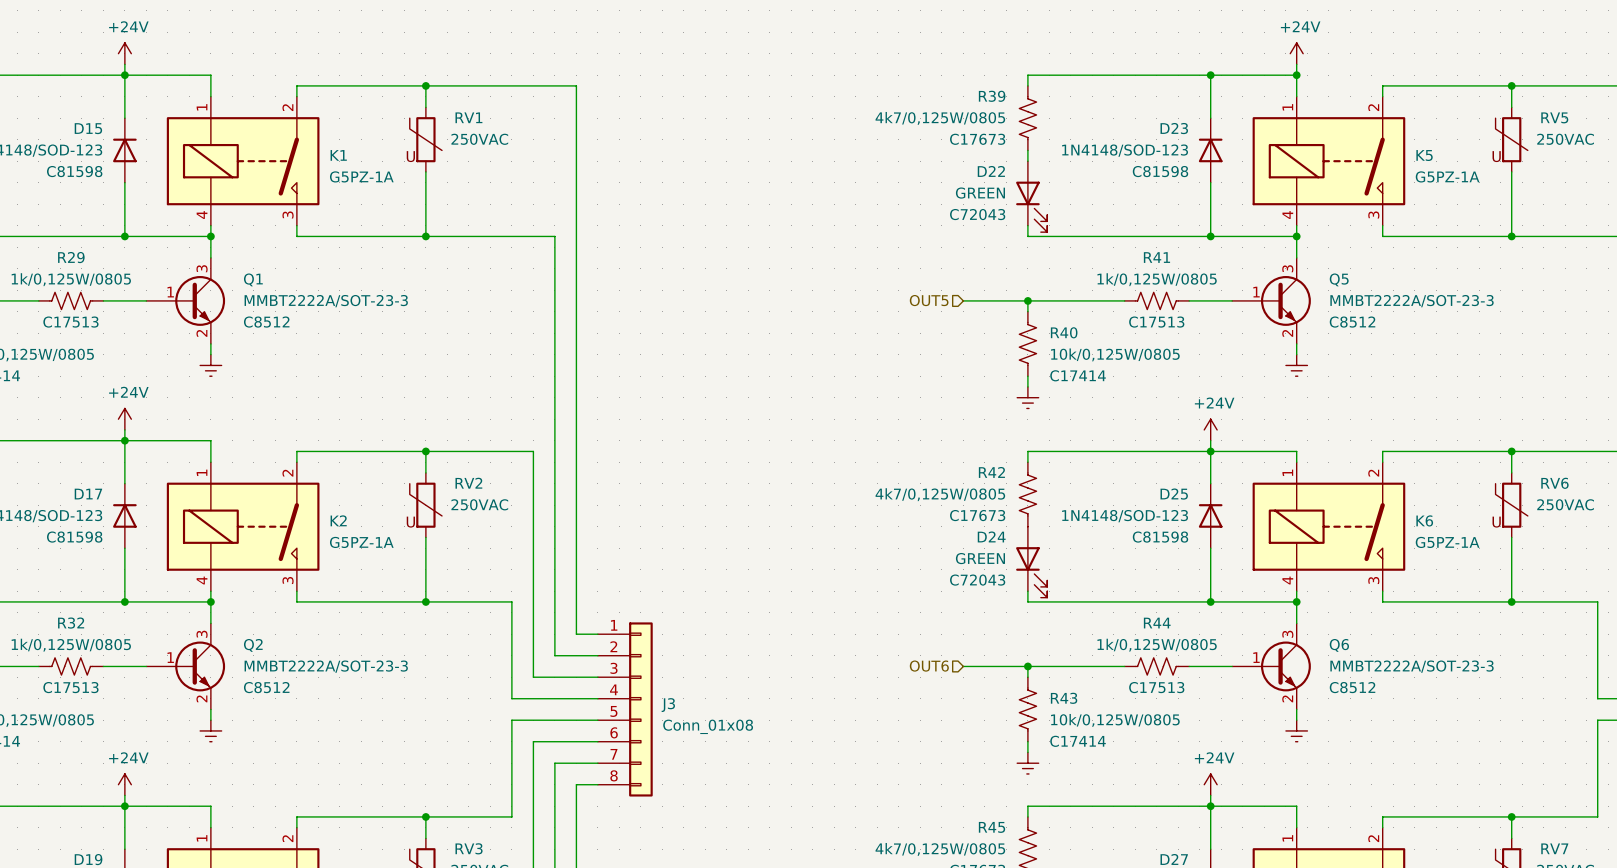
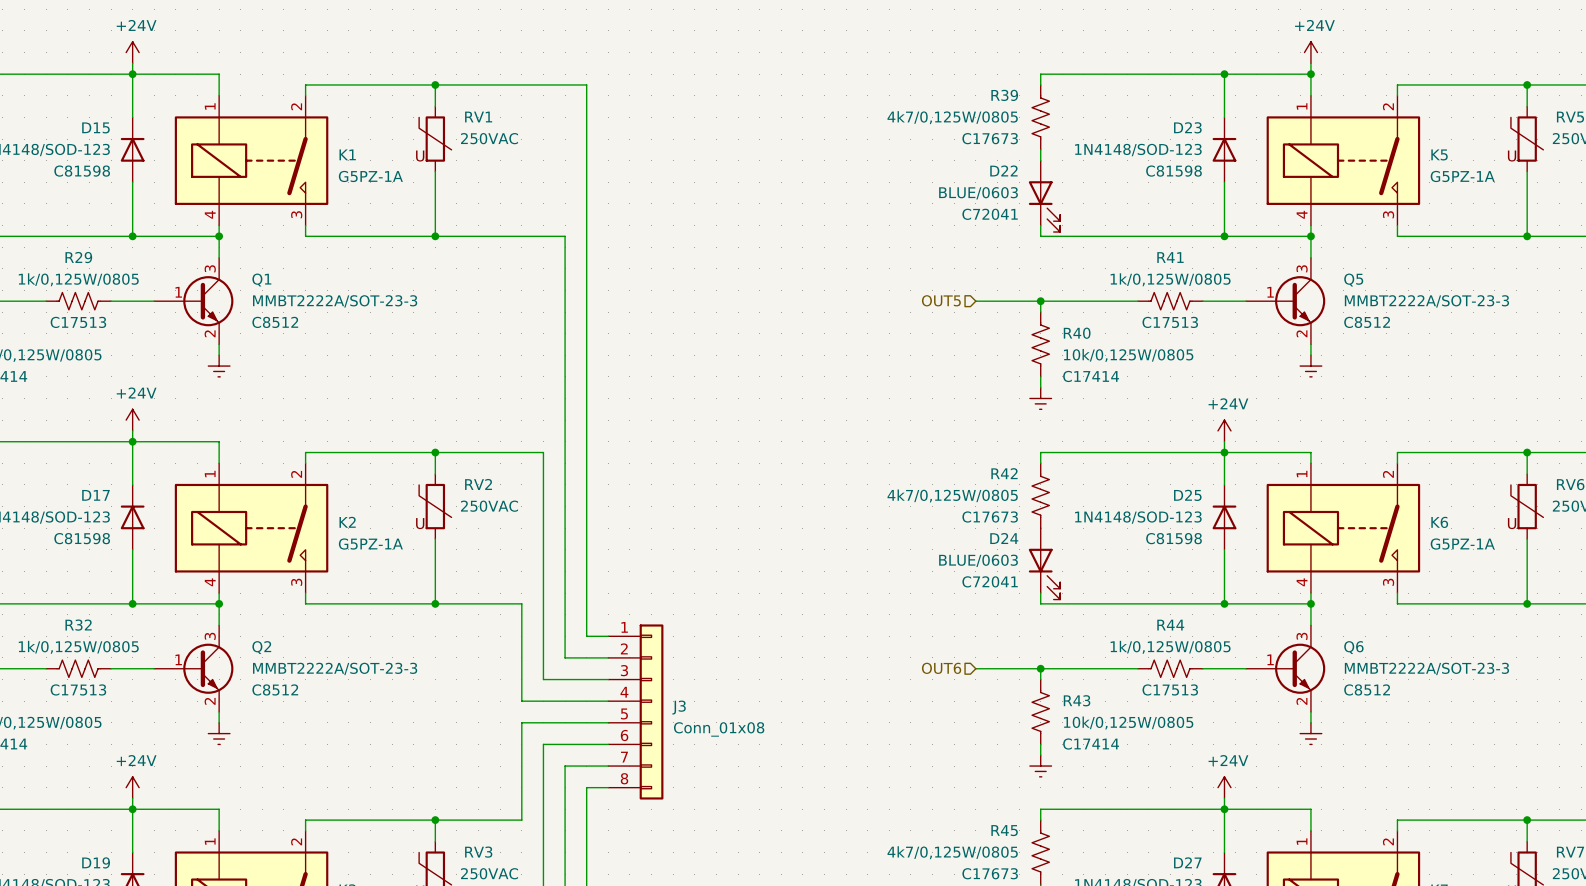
D22 value: GREEN (980, 193) -> BLUE/0603 (978, 193)
D22 text: C72043 (977, 214) -> C72041 (990, 214)
D24 value: GREEN (980, 558) -> BLUE/0603 (978, 560)
D24 text: C72043 (977, 580) -> C72041 (990, 581)

